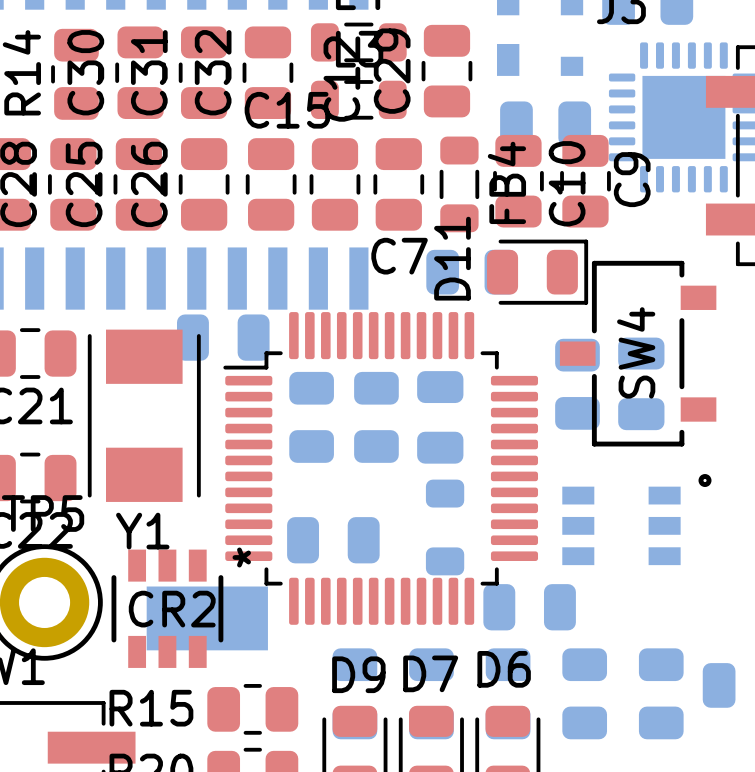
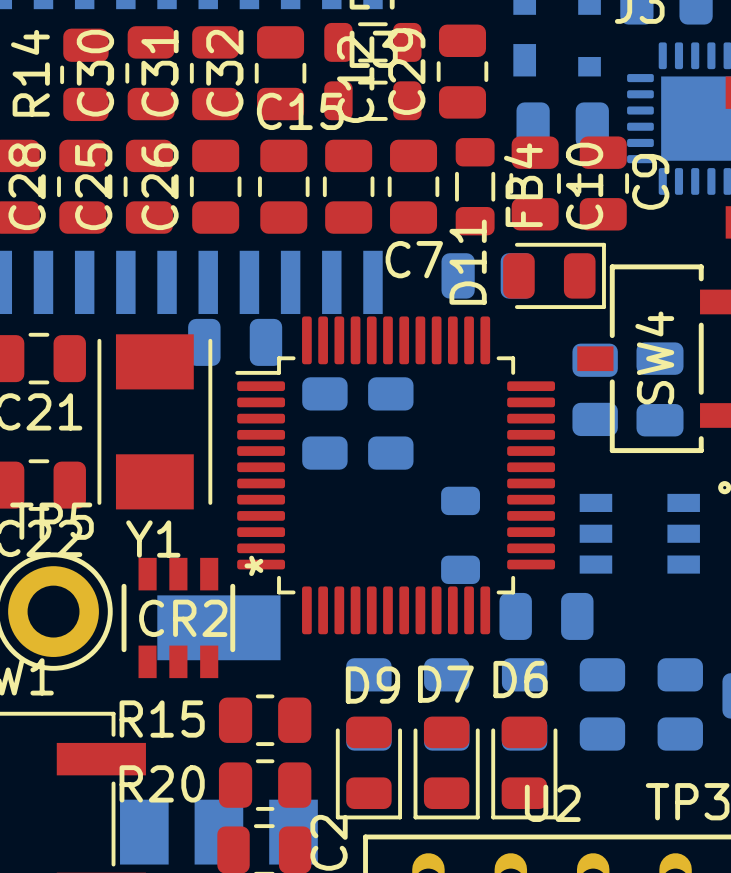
part: (440, 417) -> none
part: (333, 540) -> none

